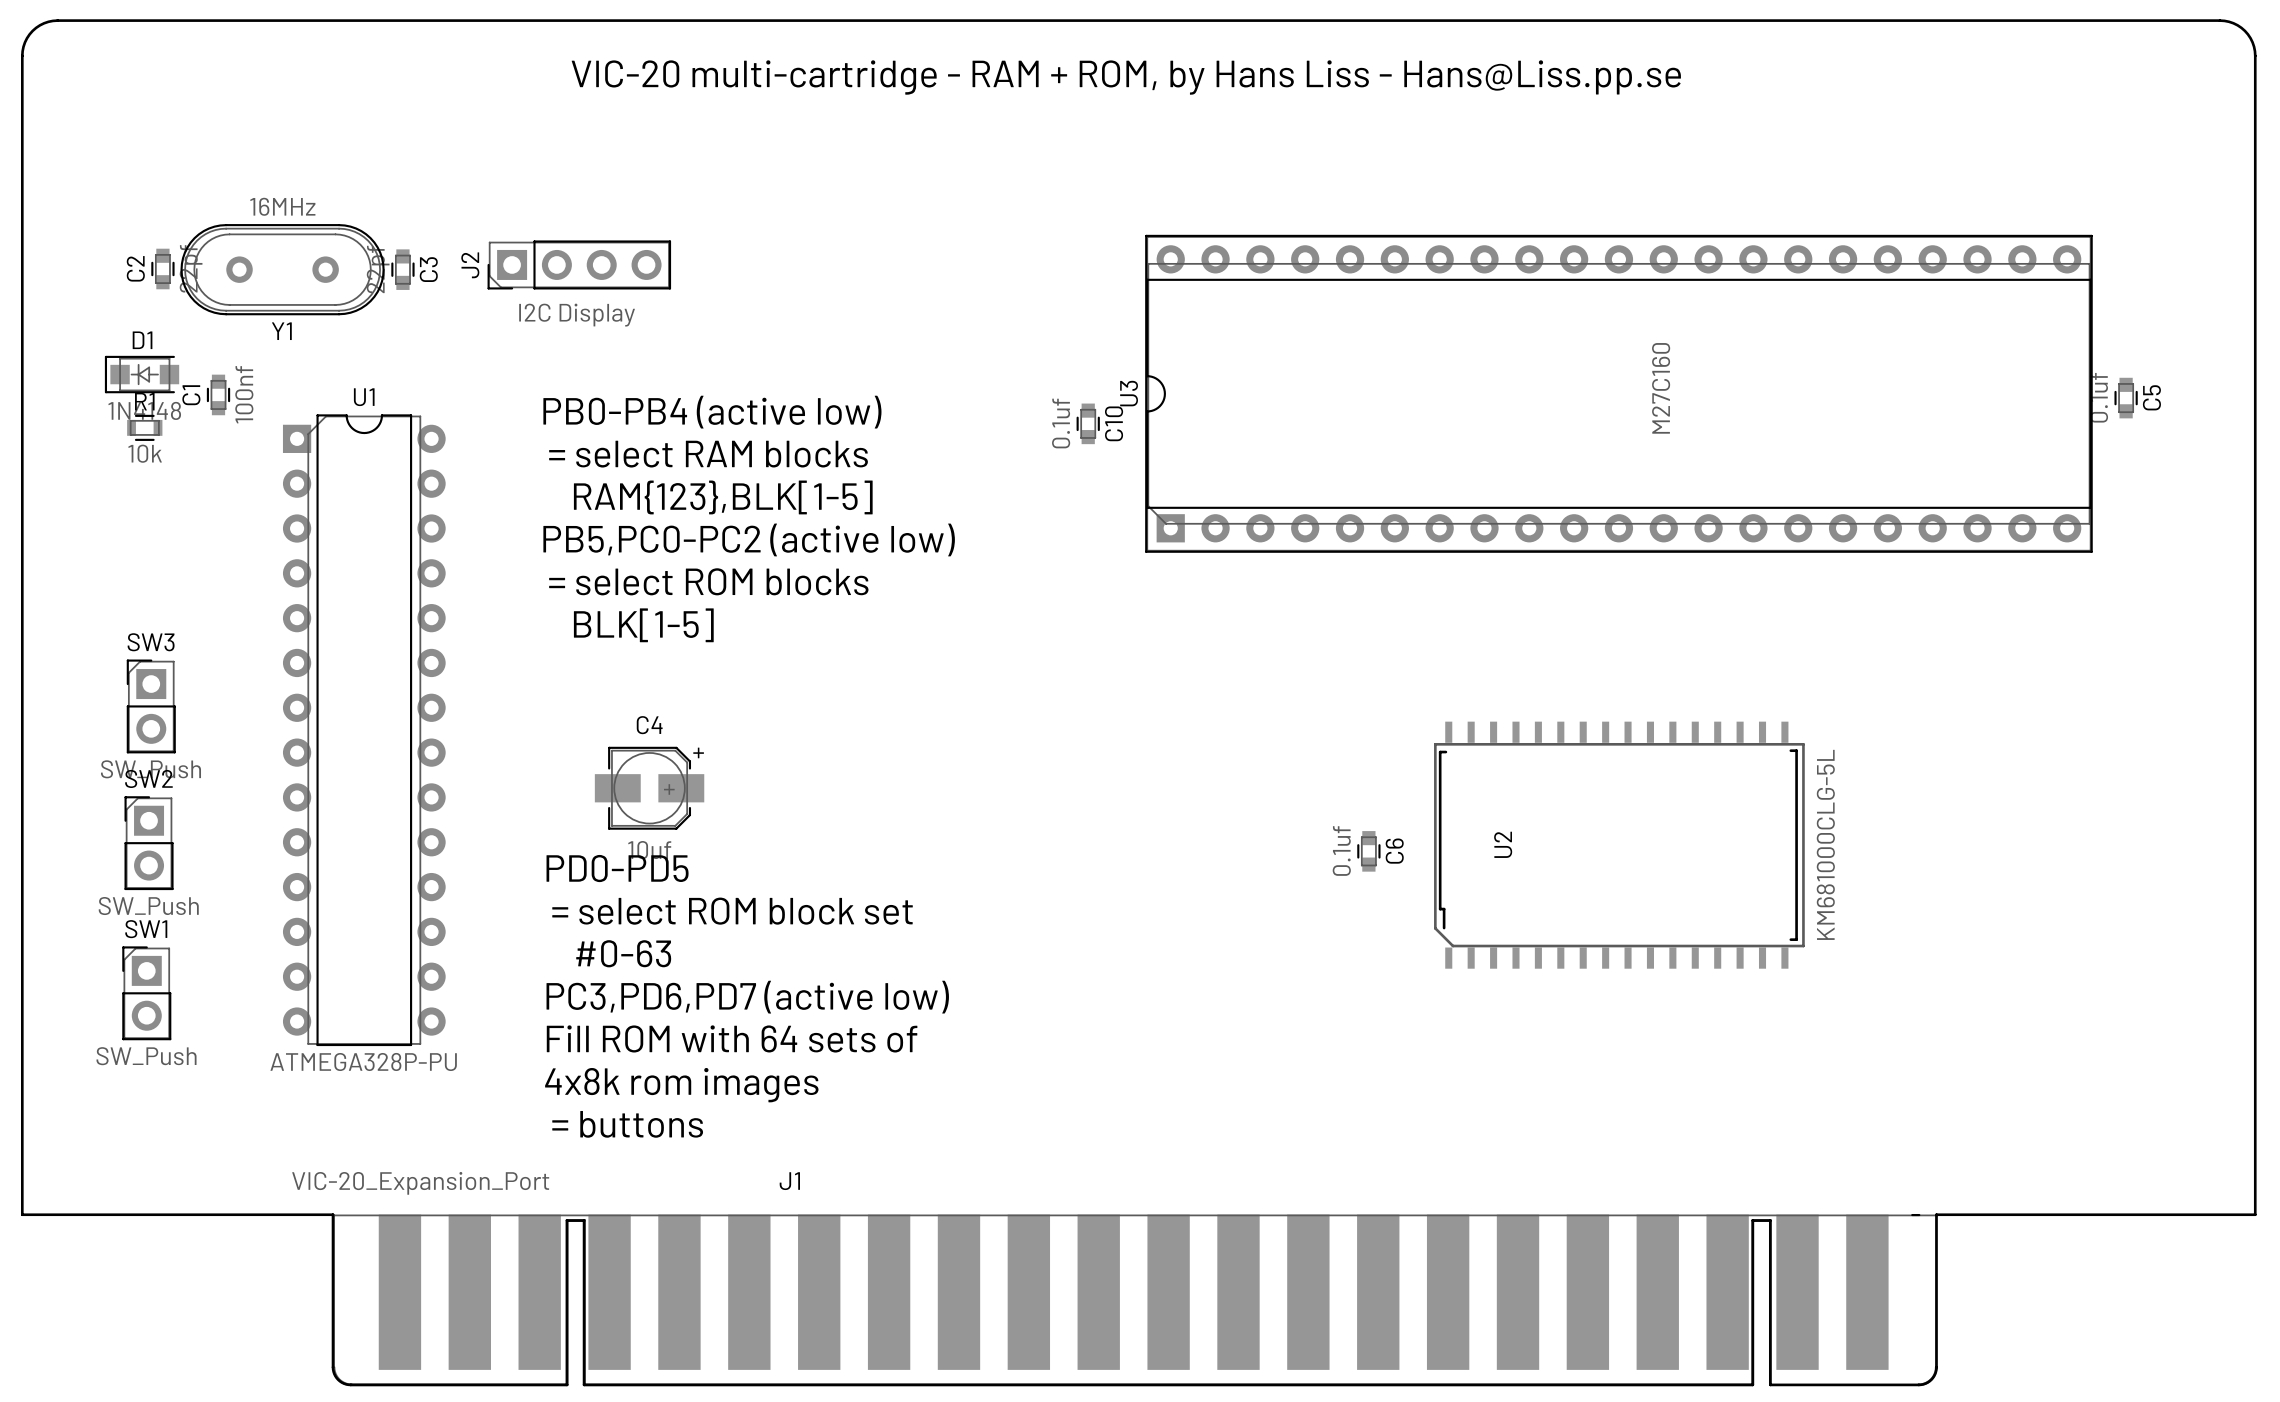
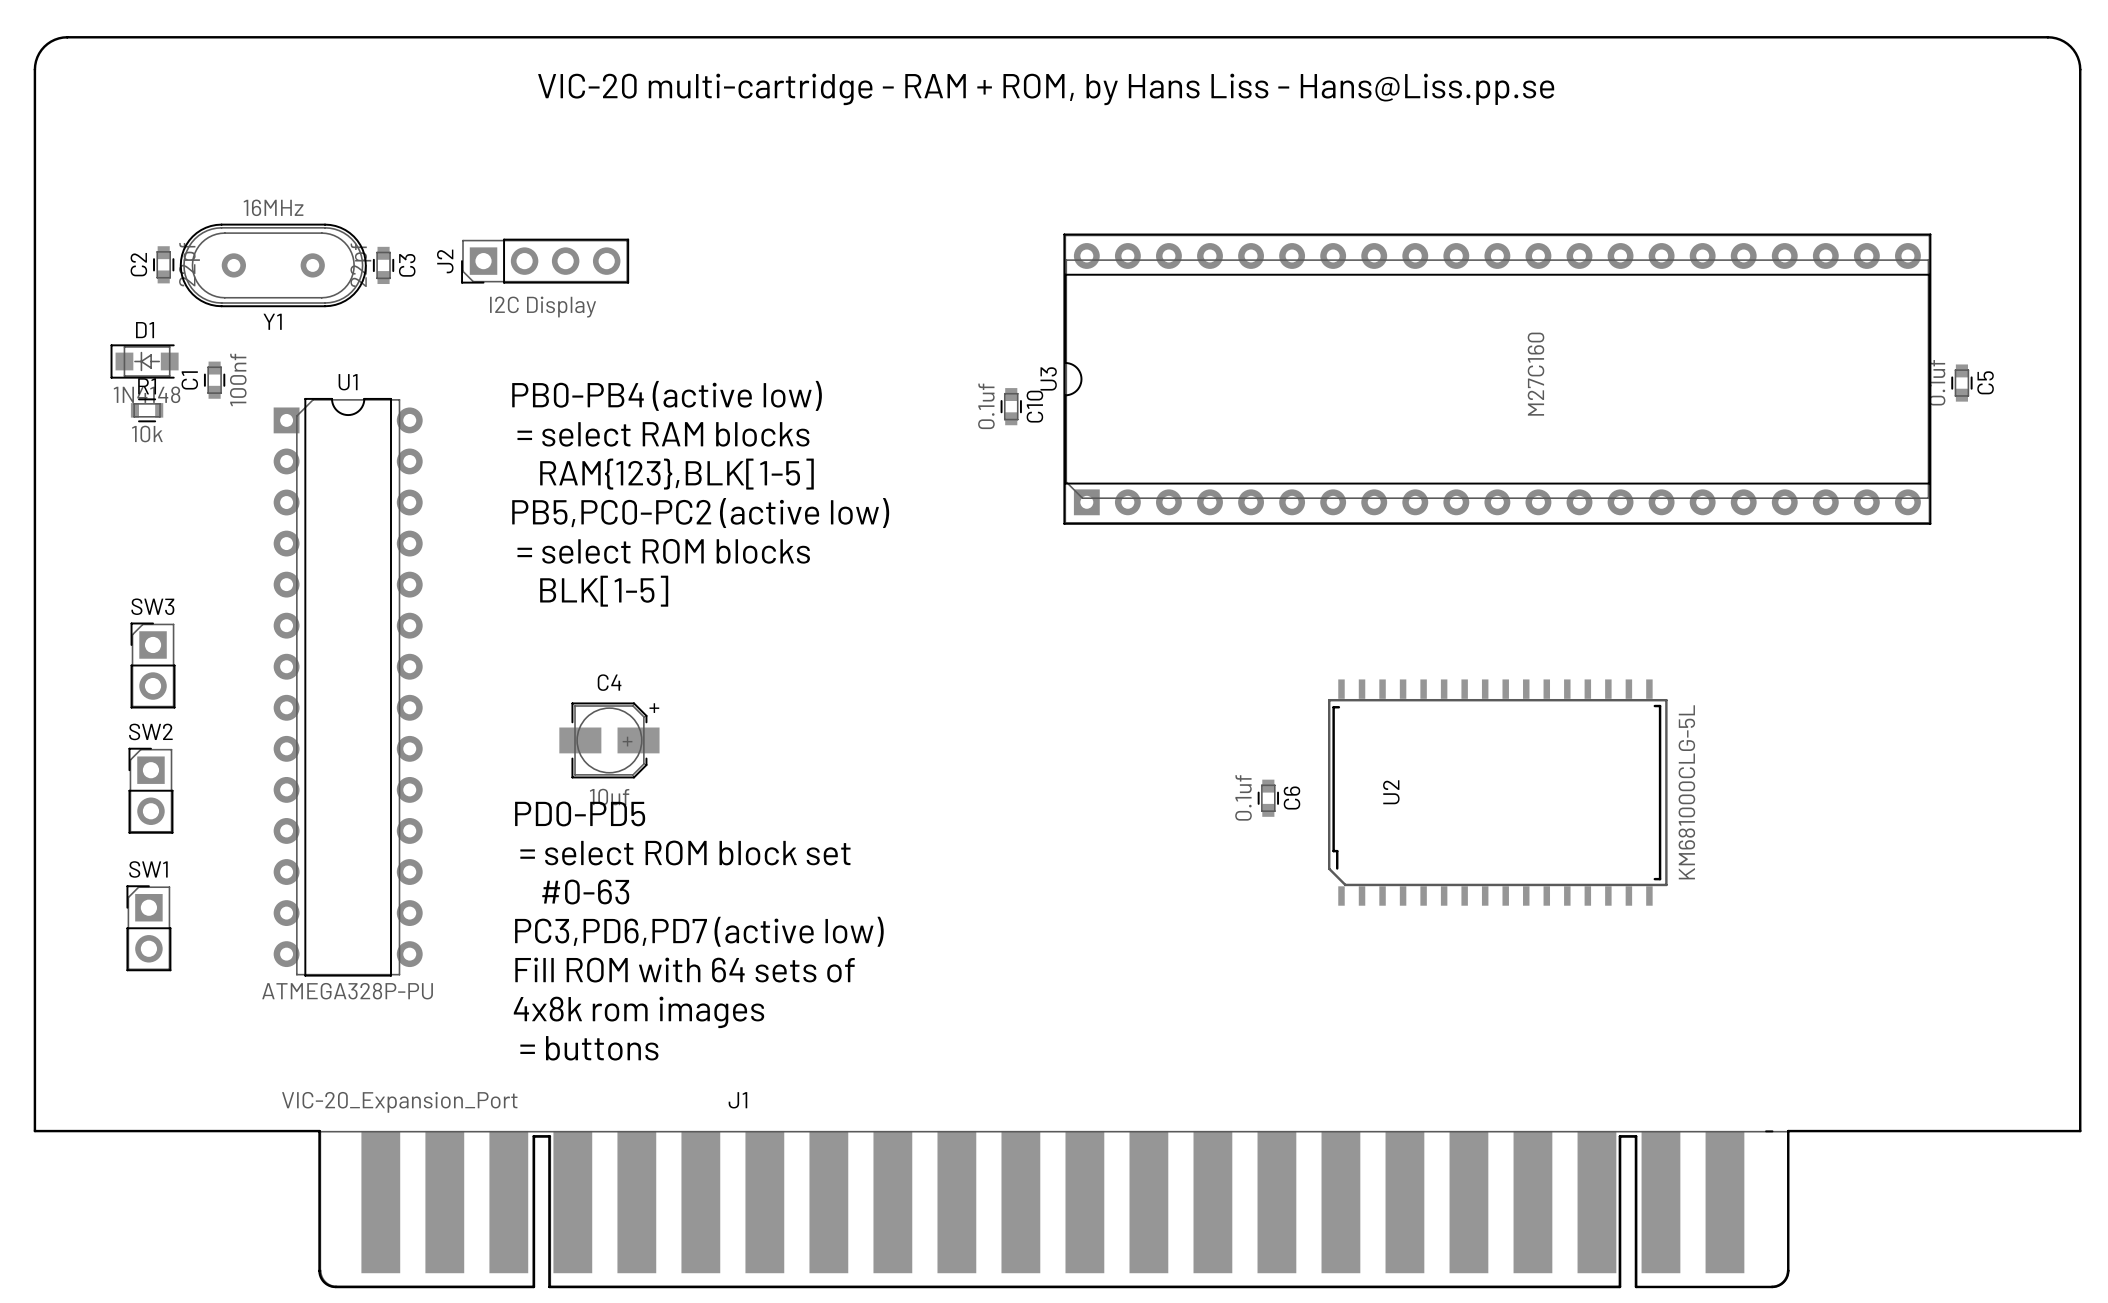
SW3 value: SW_Push (151, 769) -> none
SW2 value: SW_Push (148, 906) -> none
SW1 value: SW_Push (146, 1056) -> none

